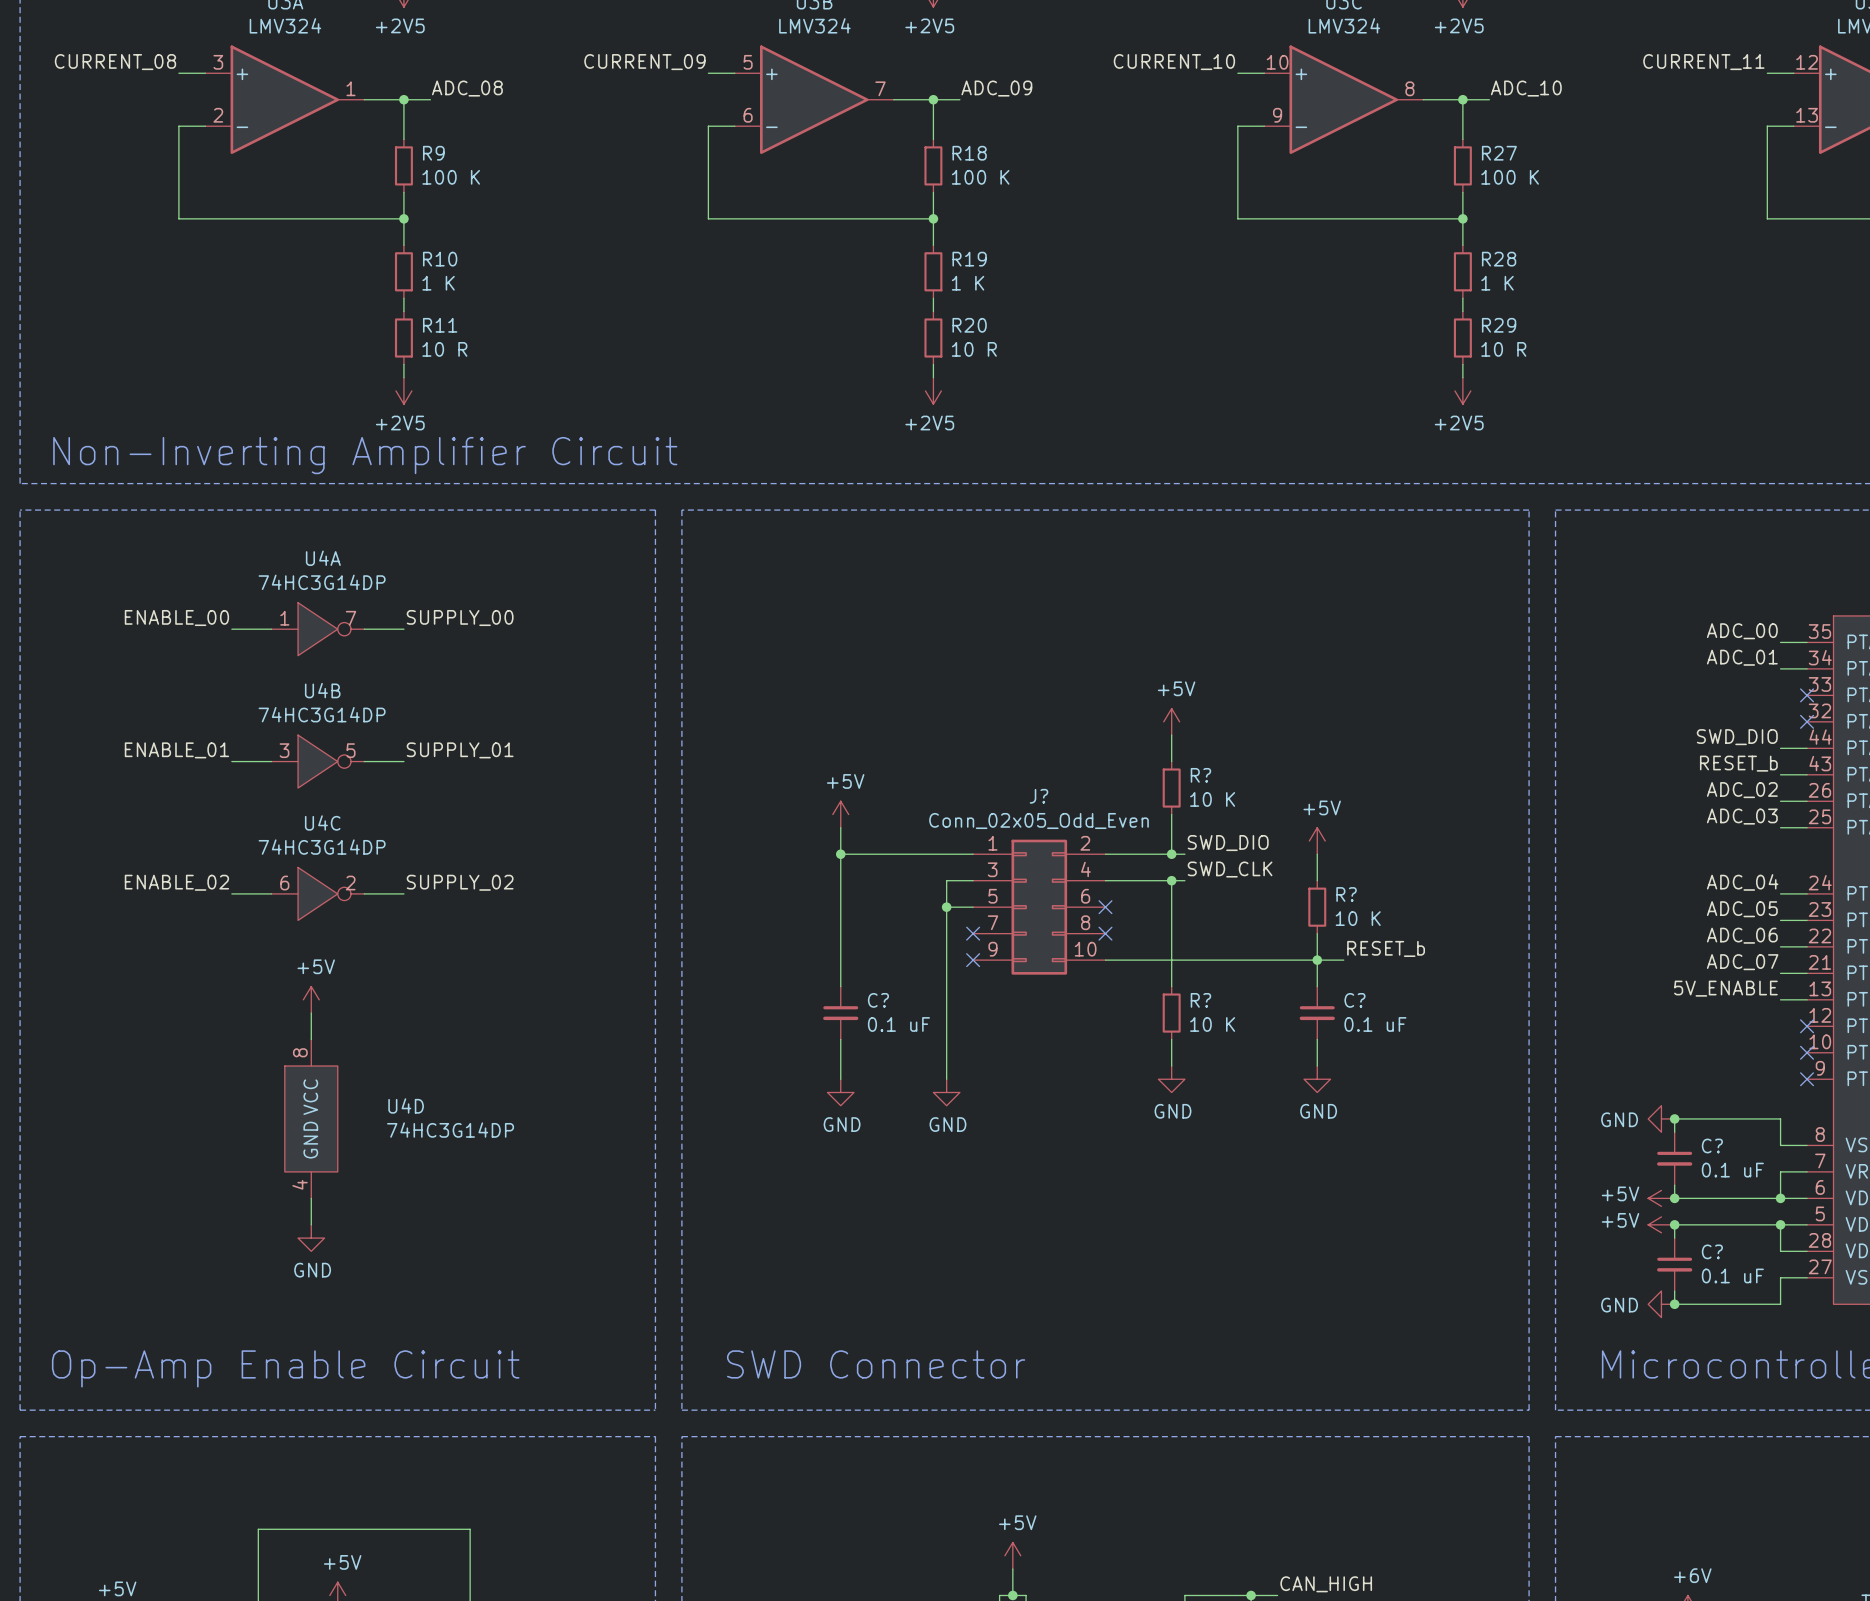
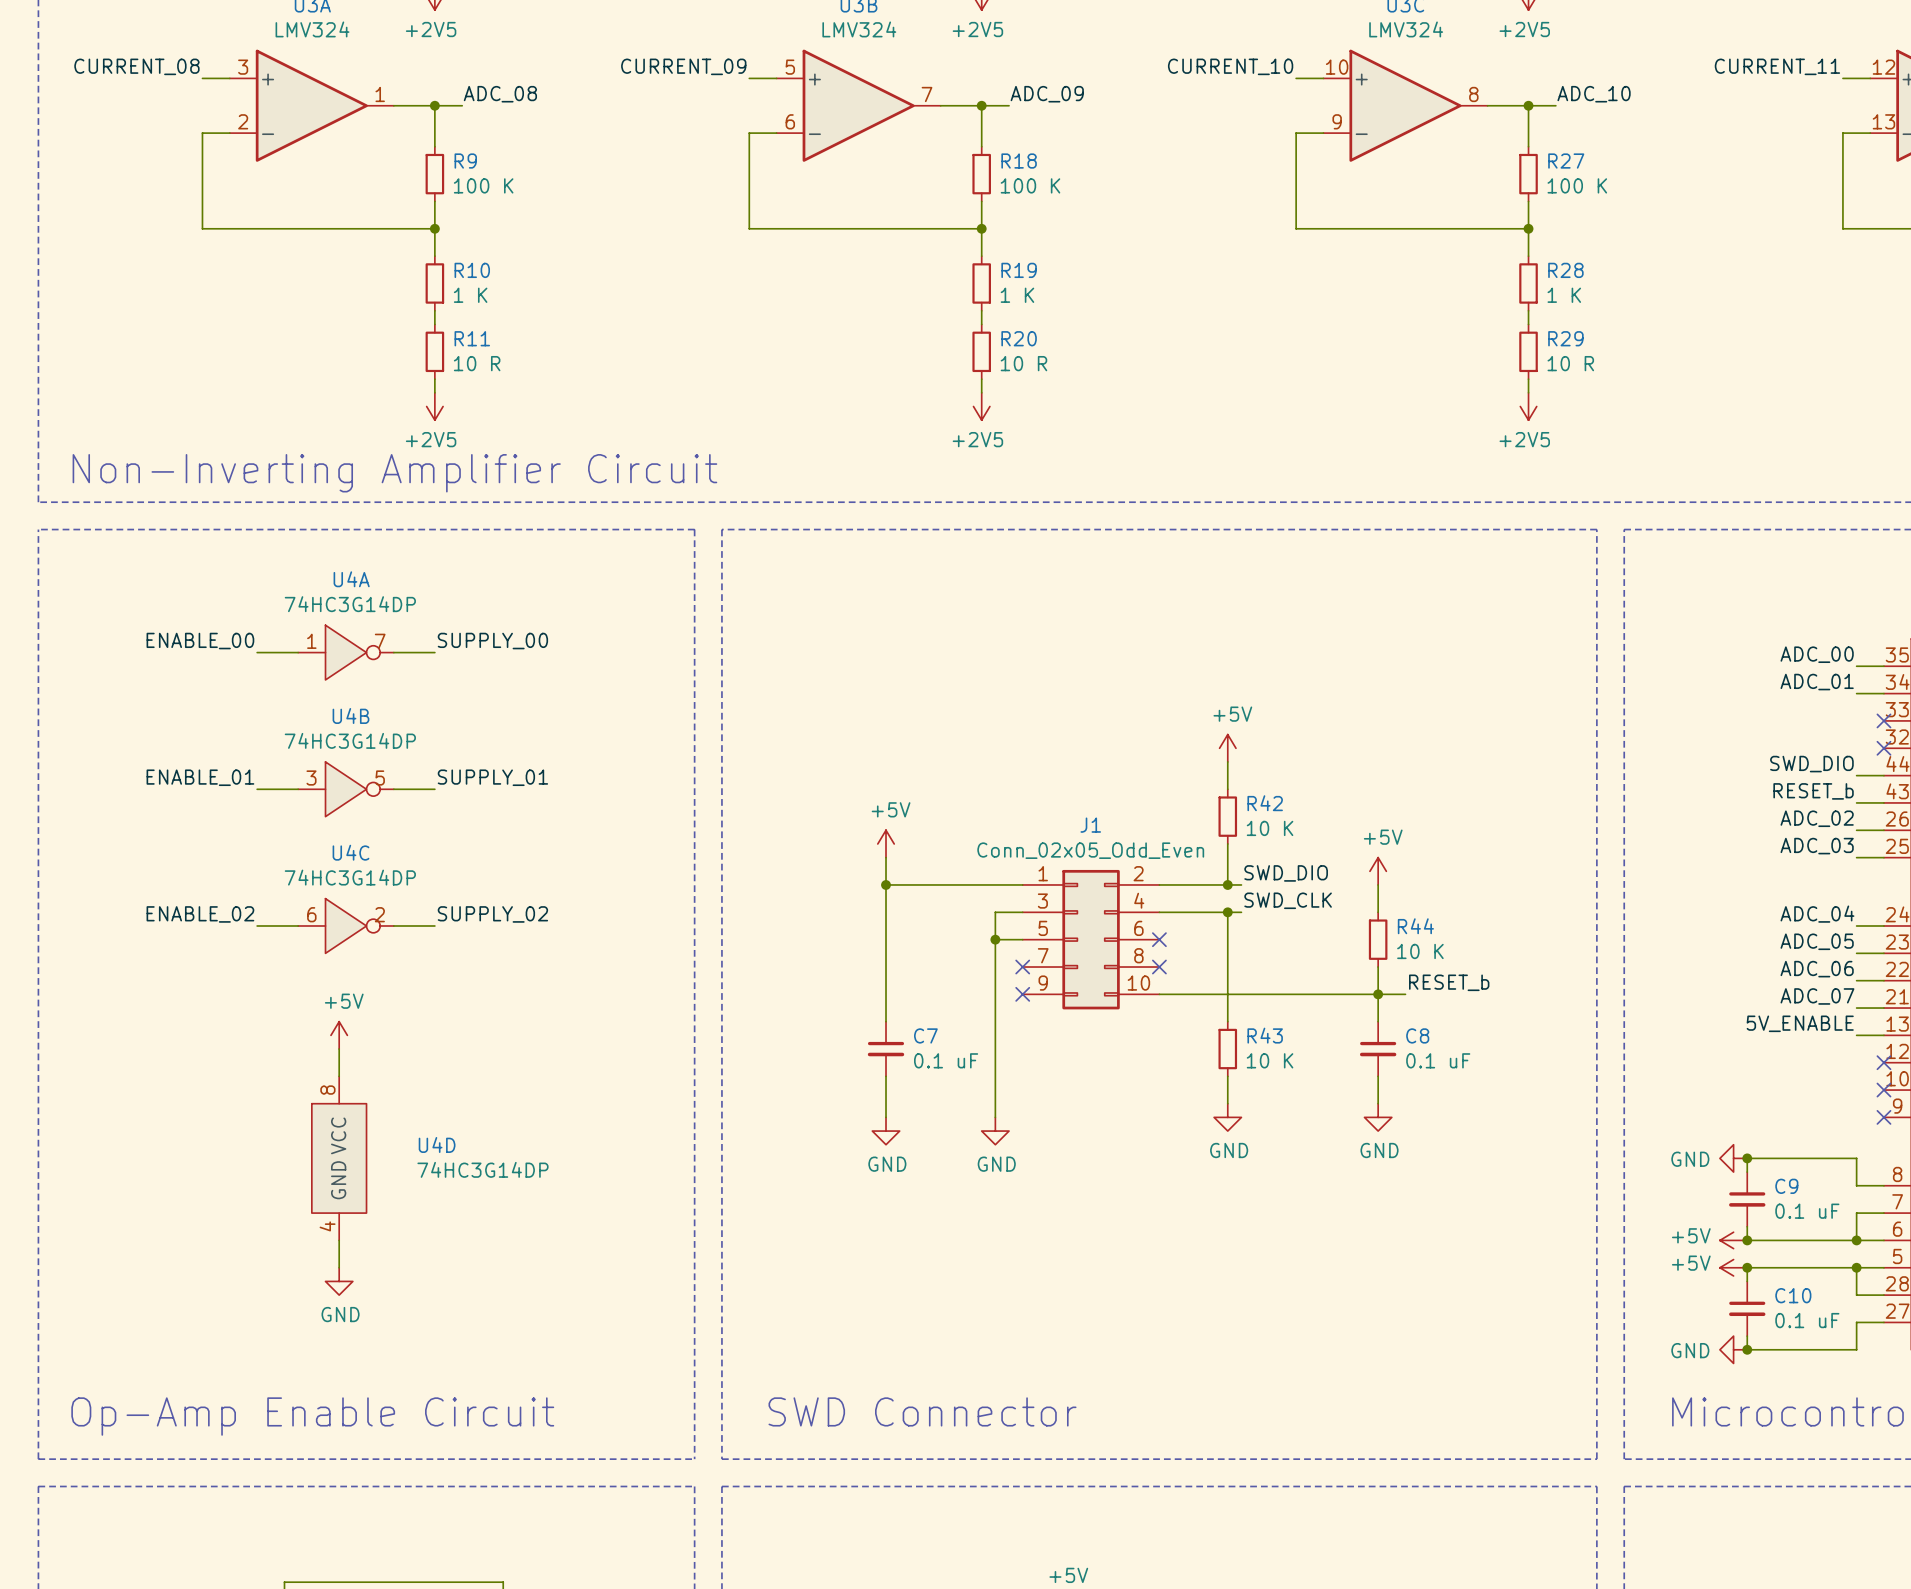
R? name: R? (1200, 775) -> R42 (1265, 803)
J? name: J? (1038, 796) -> J1 (1090, 825)
R? name: R? (1346, 894) -> R44 (1415, 926)
C? name: C? (878, 1000) -> C7 (925, 1035)
R? name: R? (1200, 1000) -> R43 (1265, 1035)
C? name: C? (1354, 1000) -> C8 (1417, 1035)
C? name: C? (1712, 1145) -> C9 (1786, 1186)
C? name: C? (1712, 1251) -> C10 (1793, 1295)

